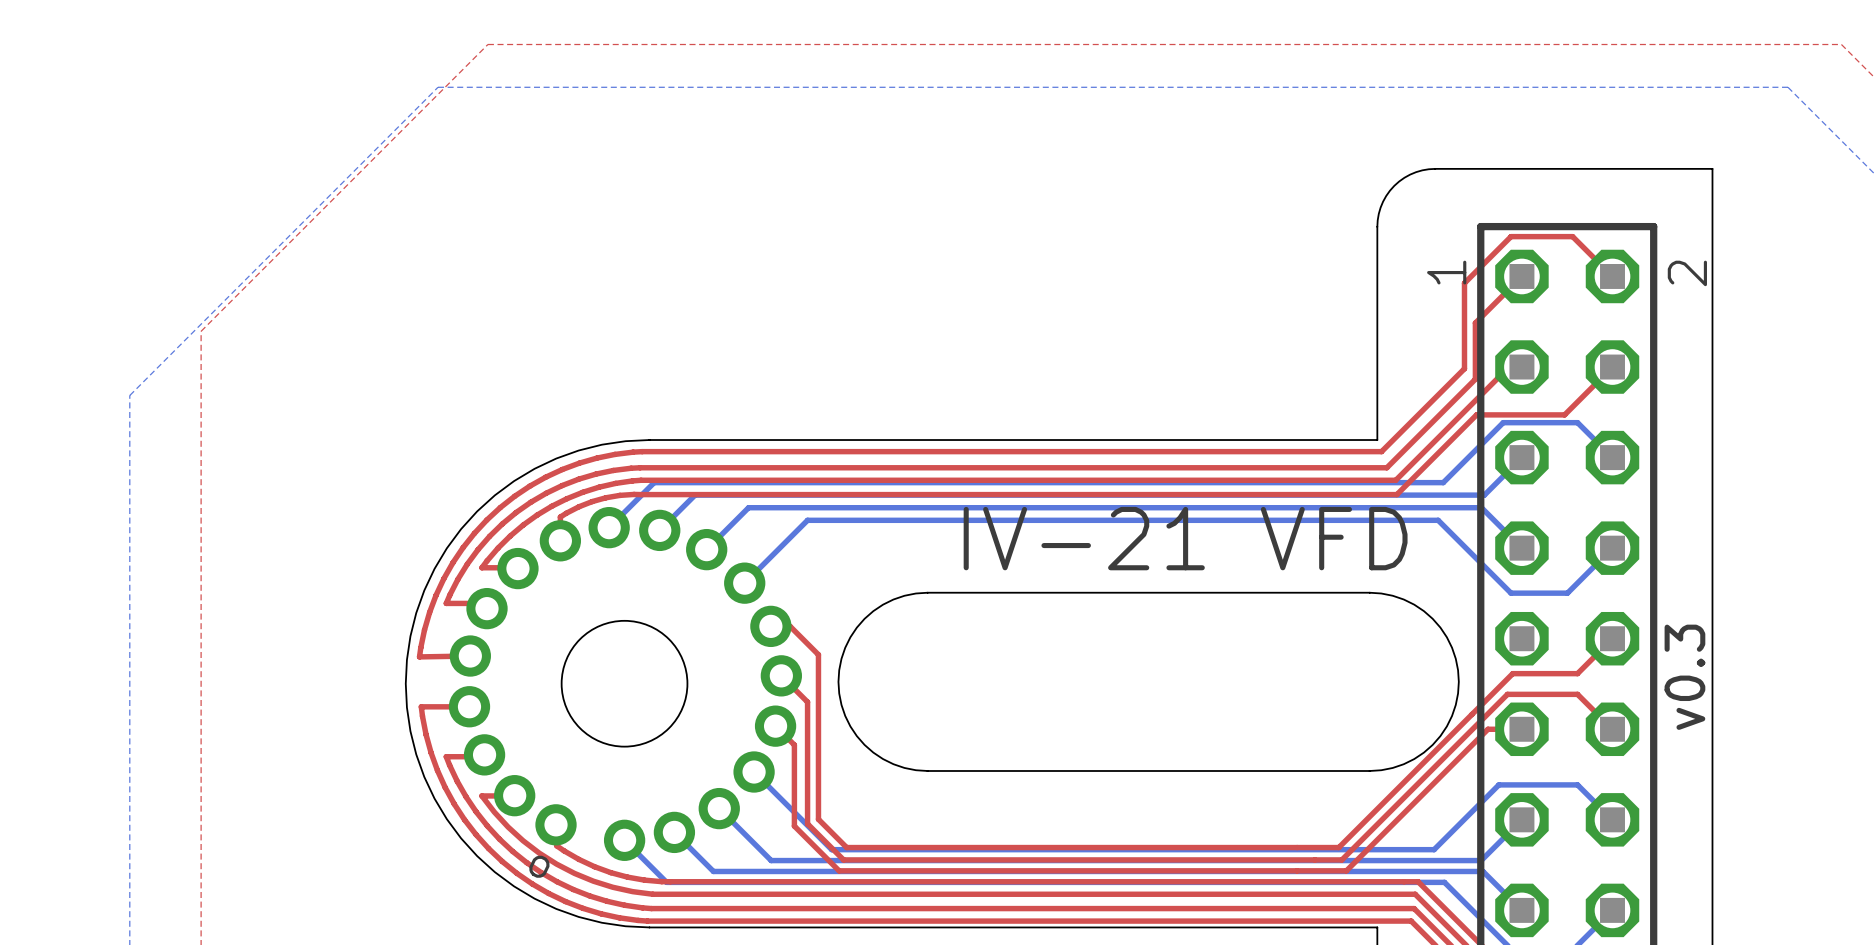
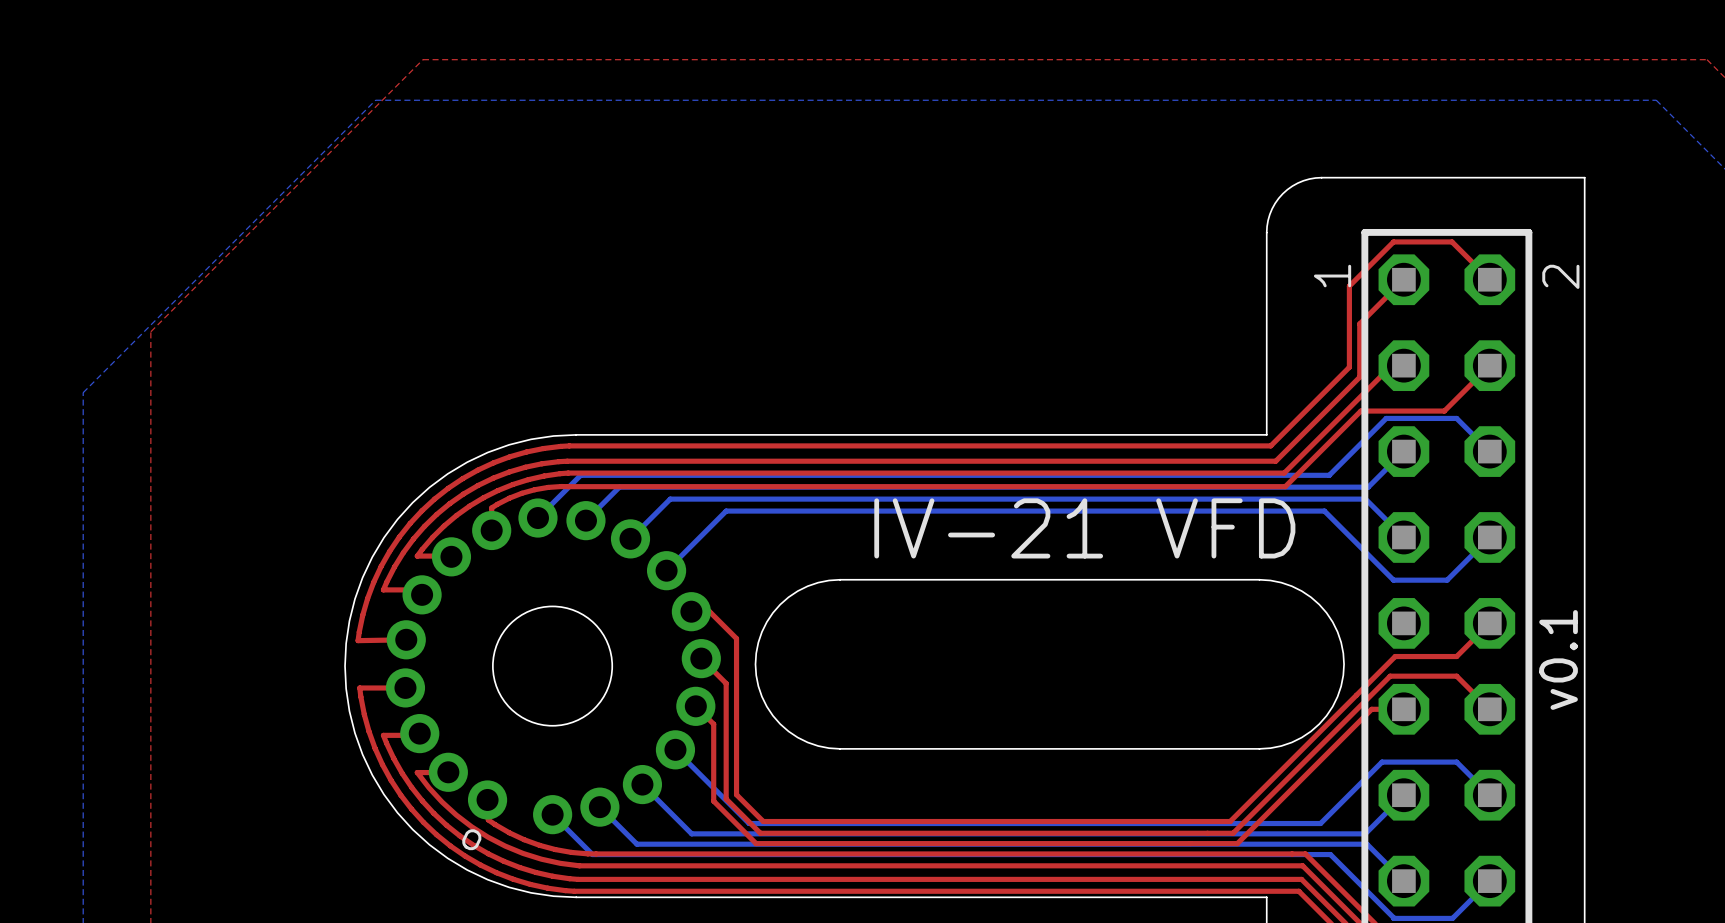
text: v0.3 (1684, 677) -> v0.1 (1558, 659)

